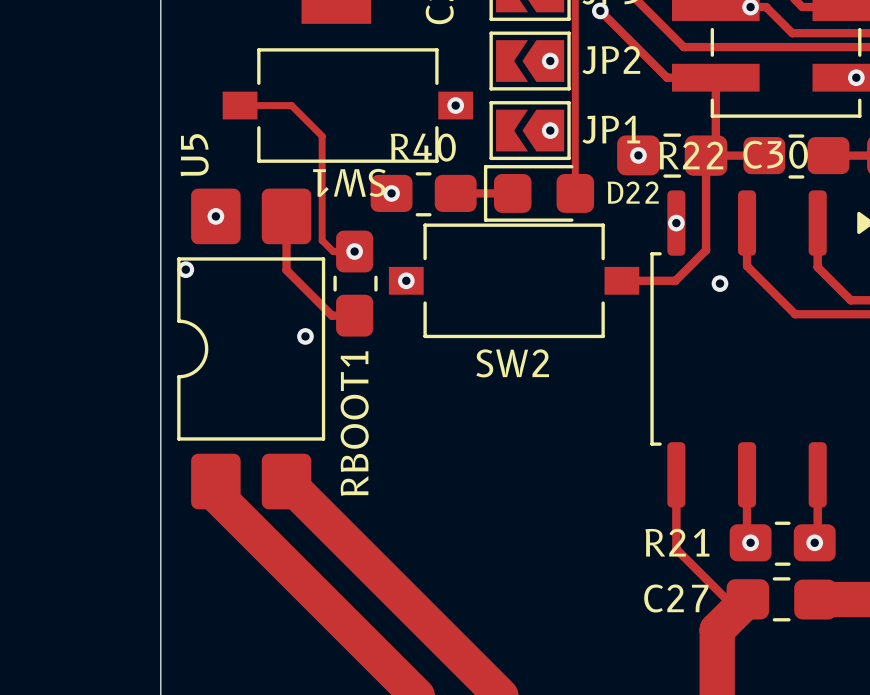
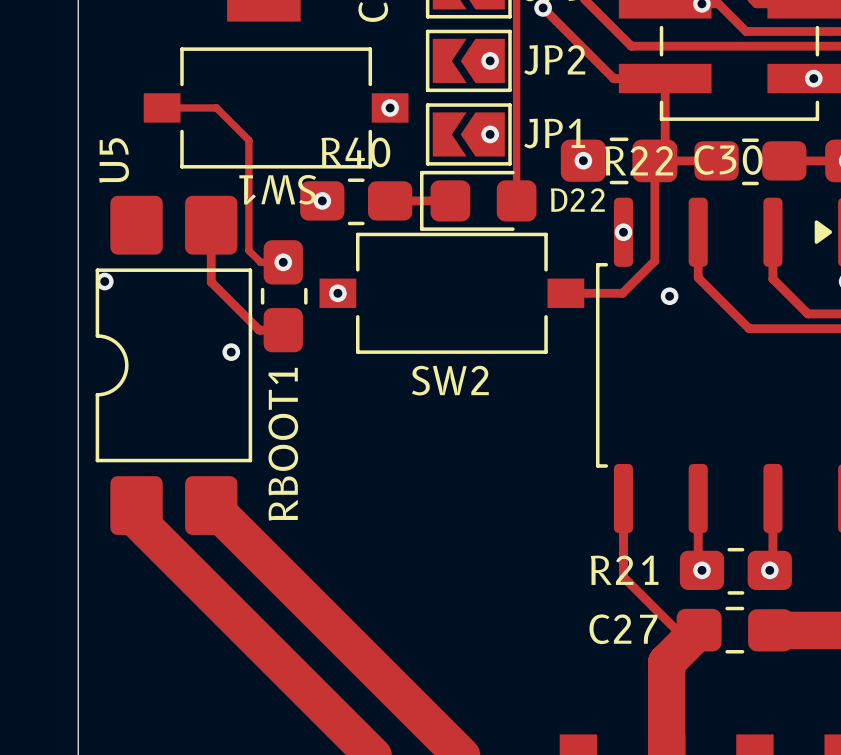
via: (215, 216) -> none

